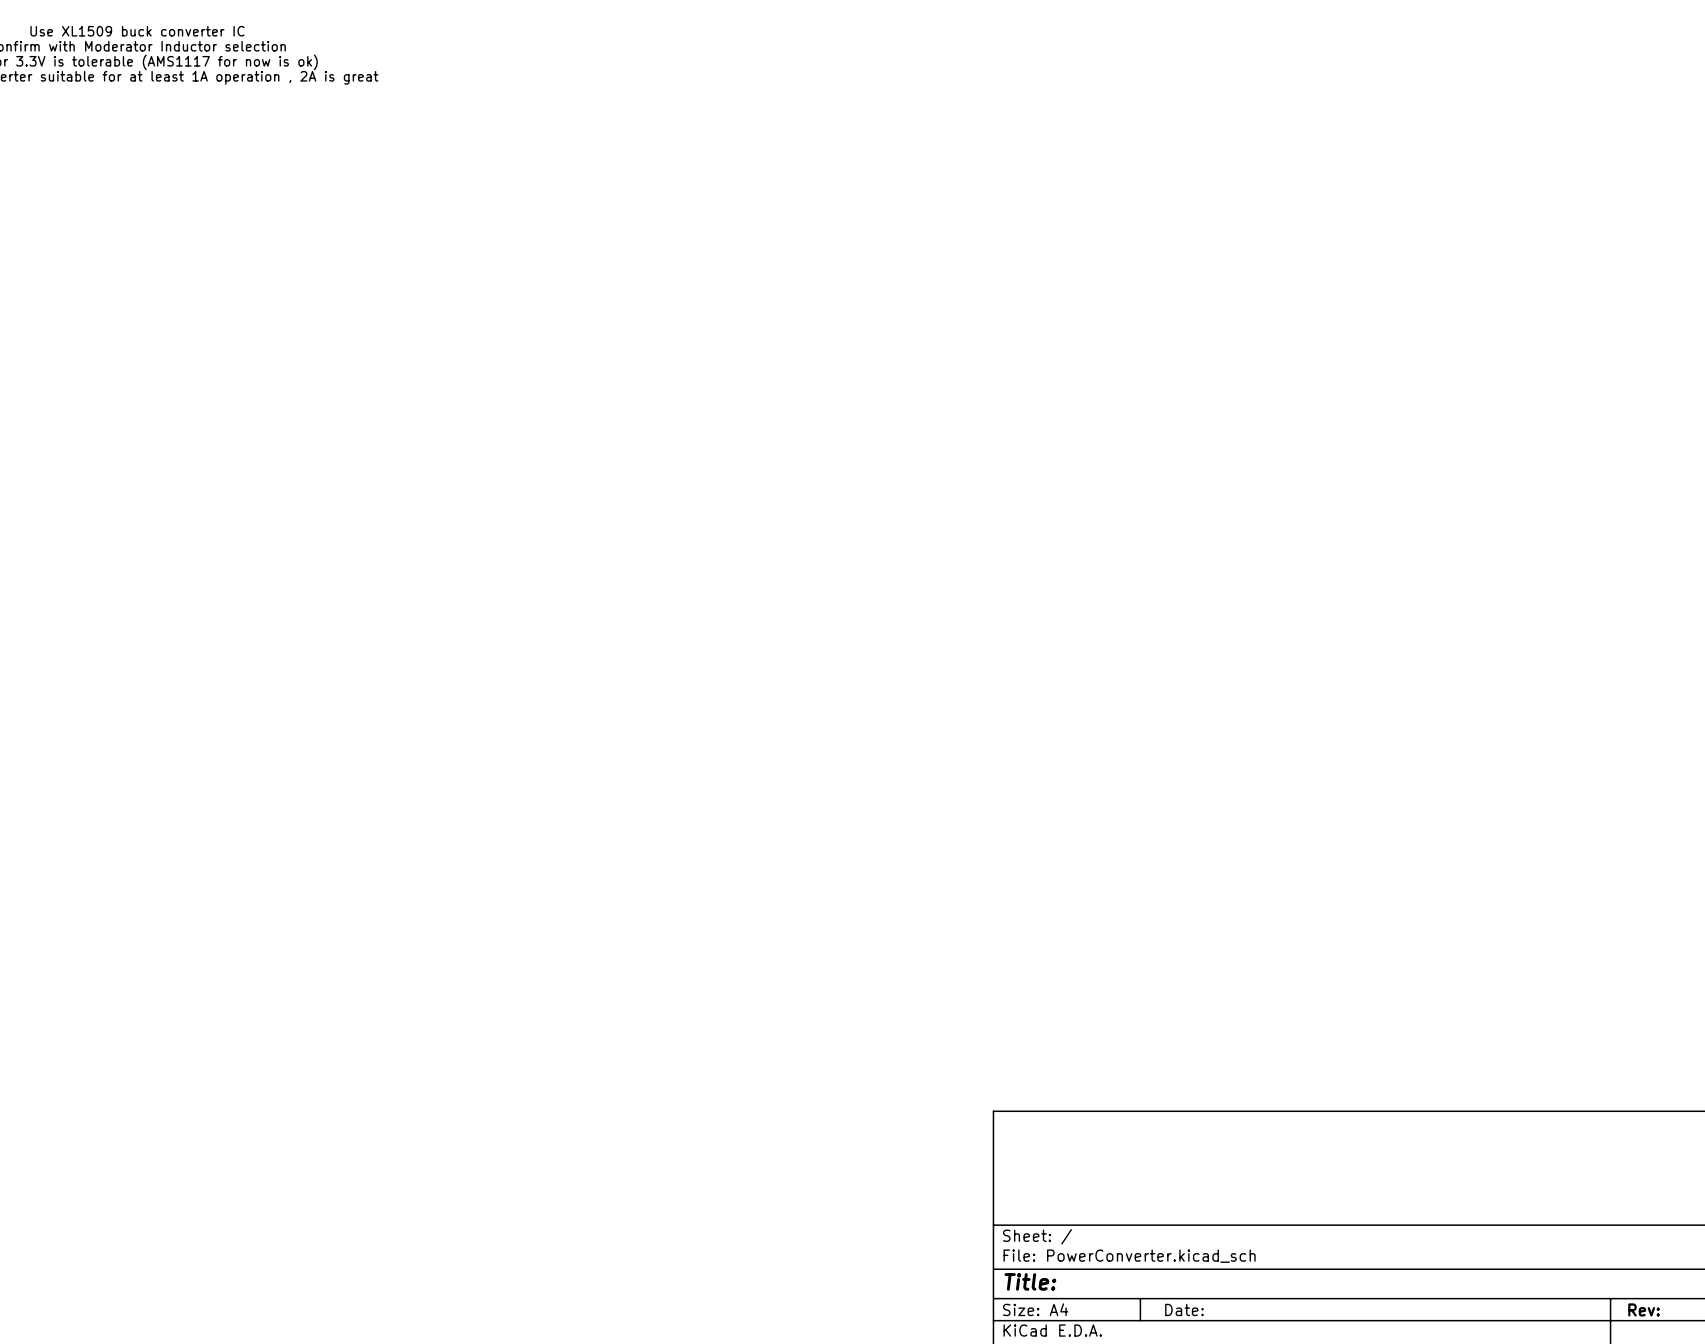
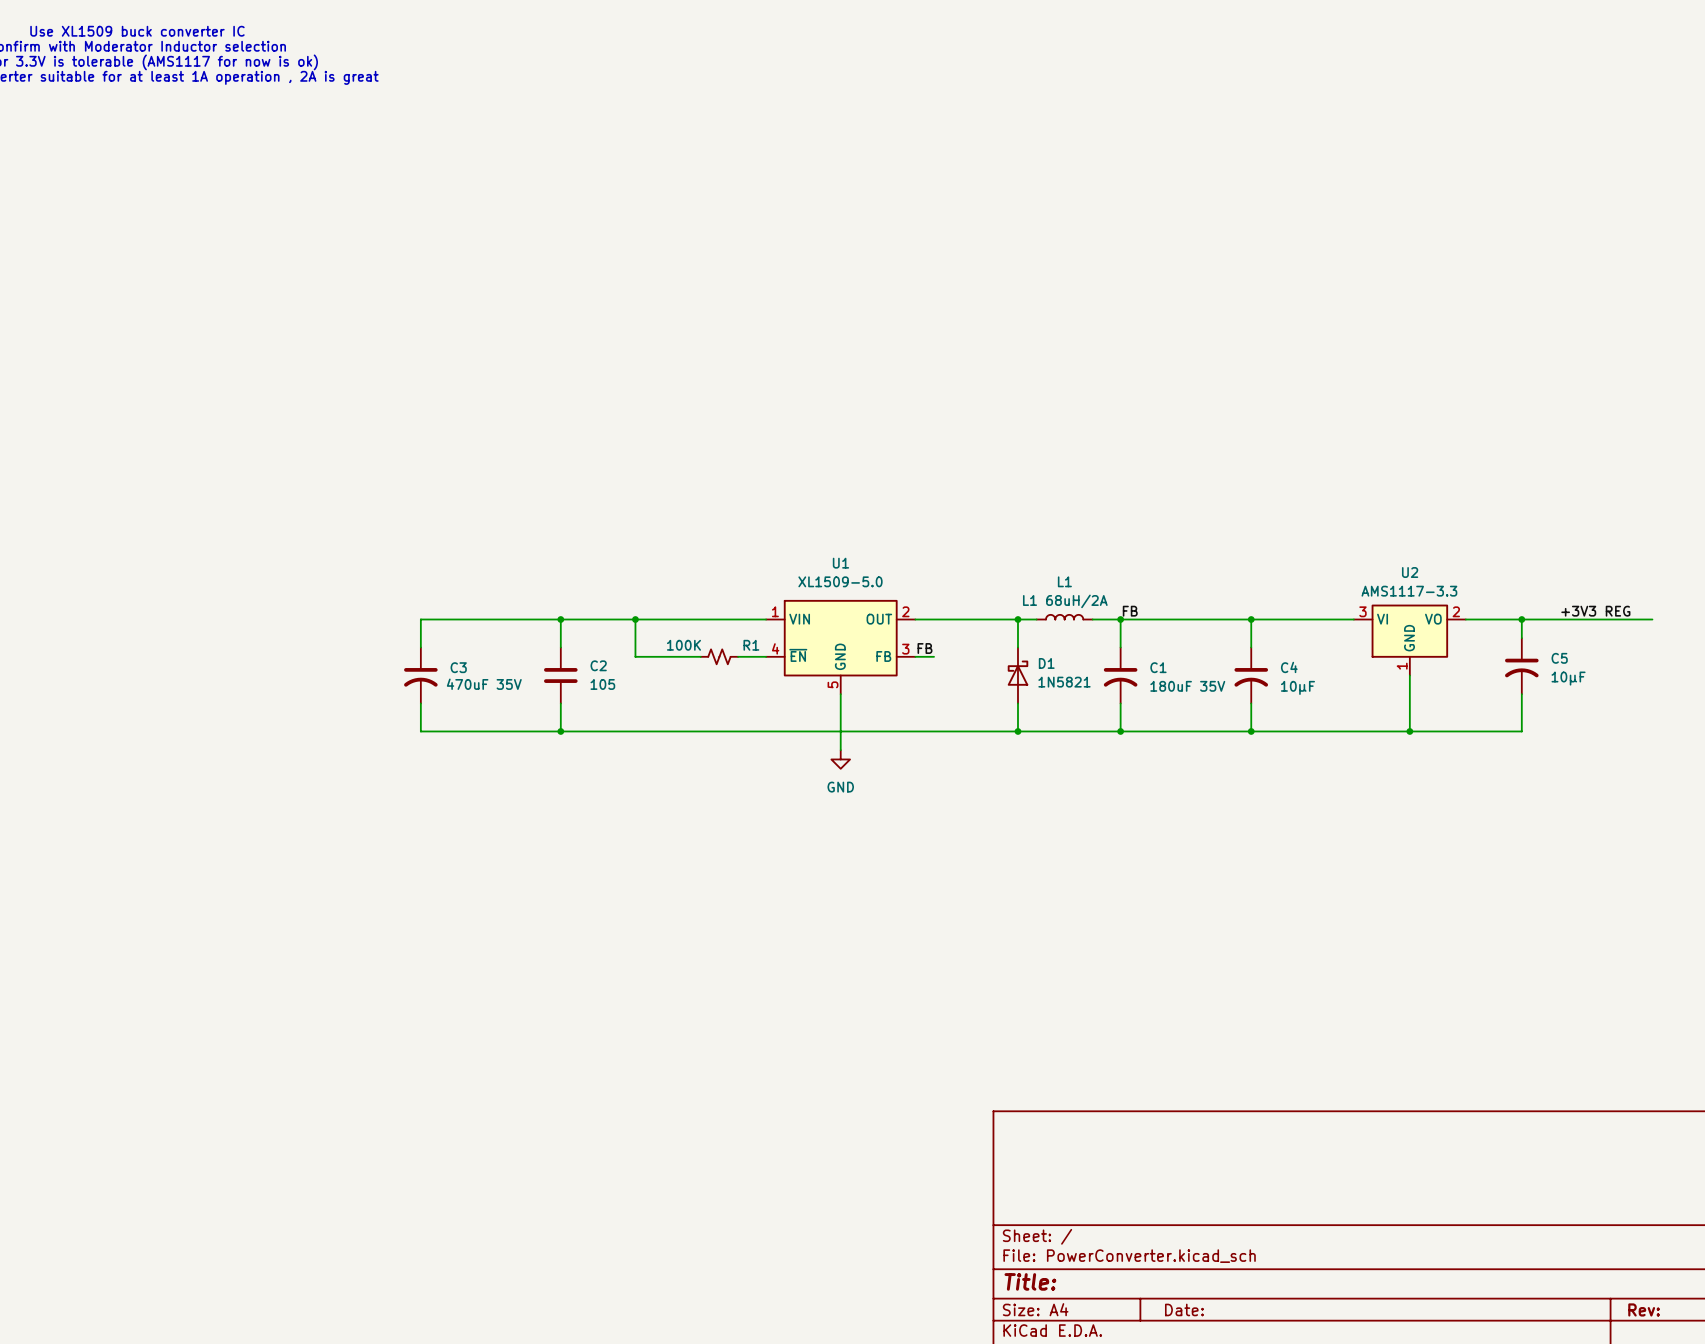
label: none -> FB (1130, 611)
label: none -> +3V3 REG (1595, 611)
L1: none -> L1 68uH/2A (1064, 617)
wire: none -> (560, 619) (560, 647)
junction: none -> (560, 619)
wire: none -> (635, 619) (635, 656) (700, 656)
junction: none -> (635, 619)
wire: none -> (766, 619) (420, 619) (420, 647)
wire: none -> (915, 619) (1036, 619)
wire: none -> (1017, 619) (1017, 647)
junction: none -> (1017, 619)
wire: none -> (1092, 619) (1353, 619)
wire: none -> (1120, 619) (1120, 647)
junction: none -> (1120, 619)
wire: none -> (1251, 619) (1251, 647)
junction: none -> (1251, 619)
wire: none -> (1465, 619) (1652, 619)
wire: none -> (1521, 619) (1521, 638)
junction: none -> (1521, 619)
U2: none -> AMS1117-3.3 (1409, 640)
U1: none -> XL1509-5.0 (840, 647)
label: none -> FB (924, 648)
R1: none -> 100K (719, 656)
wire: none -> (738, 656) (766, 656)
wire: none -> (915, 656) (934, 656)
C5: none -> 10µF (1521, 666)
C3: none -> 470uF 35V (420, 675)
C2: none -> 105 (560, 675)
D1: none -> 1N5821 (1017, 675)
C1: none -> 180uF 35V (1120, 675)
C4: none -> 10µF (1251, 675)
wire: none -> (1409, 675) (1409, 731)
wire: none -> (840, 694) (840, 750)
wire: none -> (1521, 694) (1521, 731) (420, 731) (420, 703)
wire: none -> (560, 703) (560, 731)
wire: none -> (1017, 703) (1017, 731)
wire: none -> (1120, 703) (1120, 731)
wire: none -> (1251, 703) (1251, 731)
junction: none -> (560, 731)
junction: none -> (1017, 731)
junction: none -> (1120, 731)
junction: none -> (1251, 731)
junction: none -> (1409, 731)
power symbol: none -> GND (840, 759)

